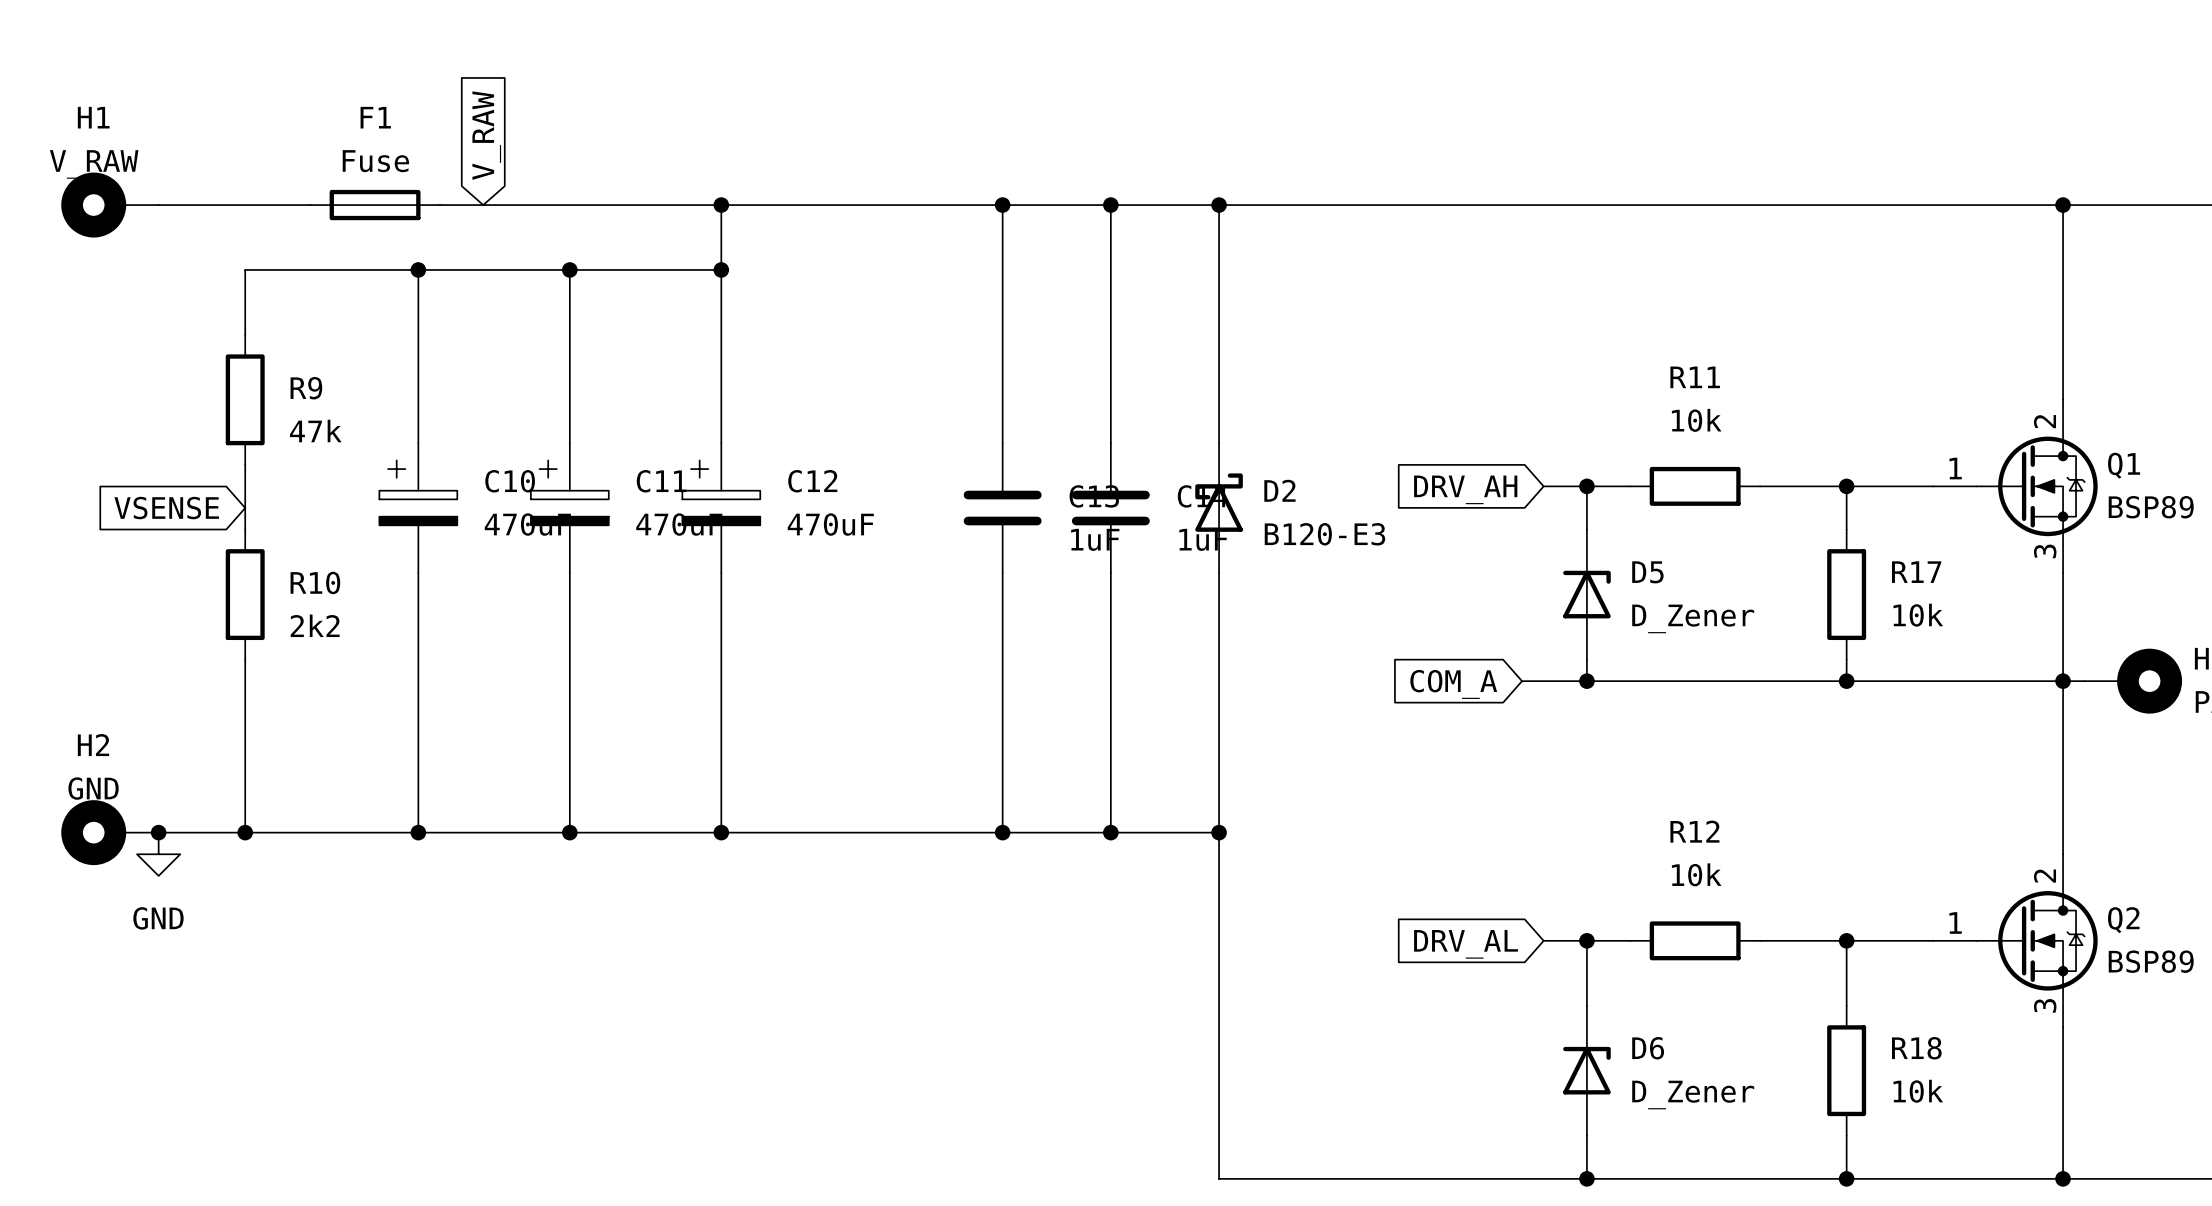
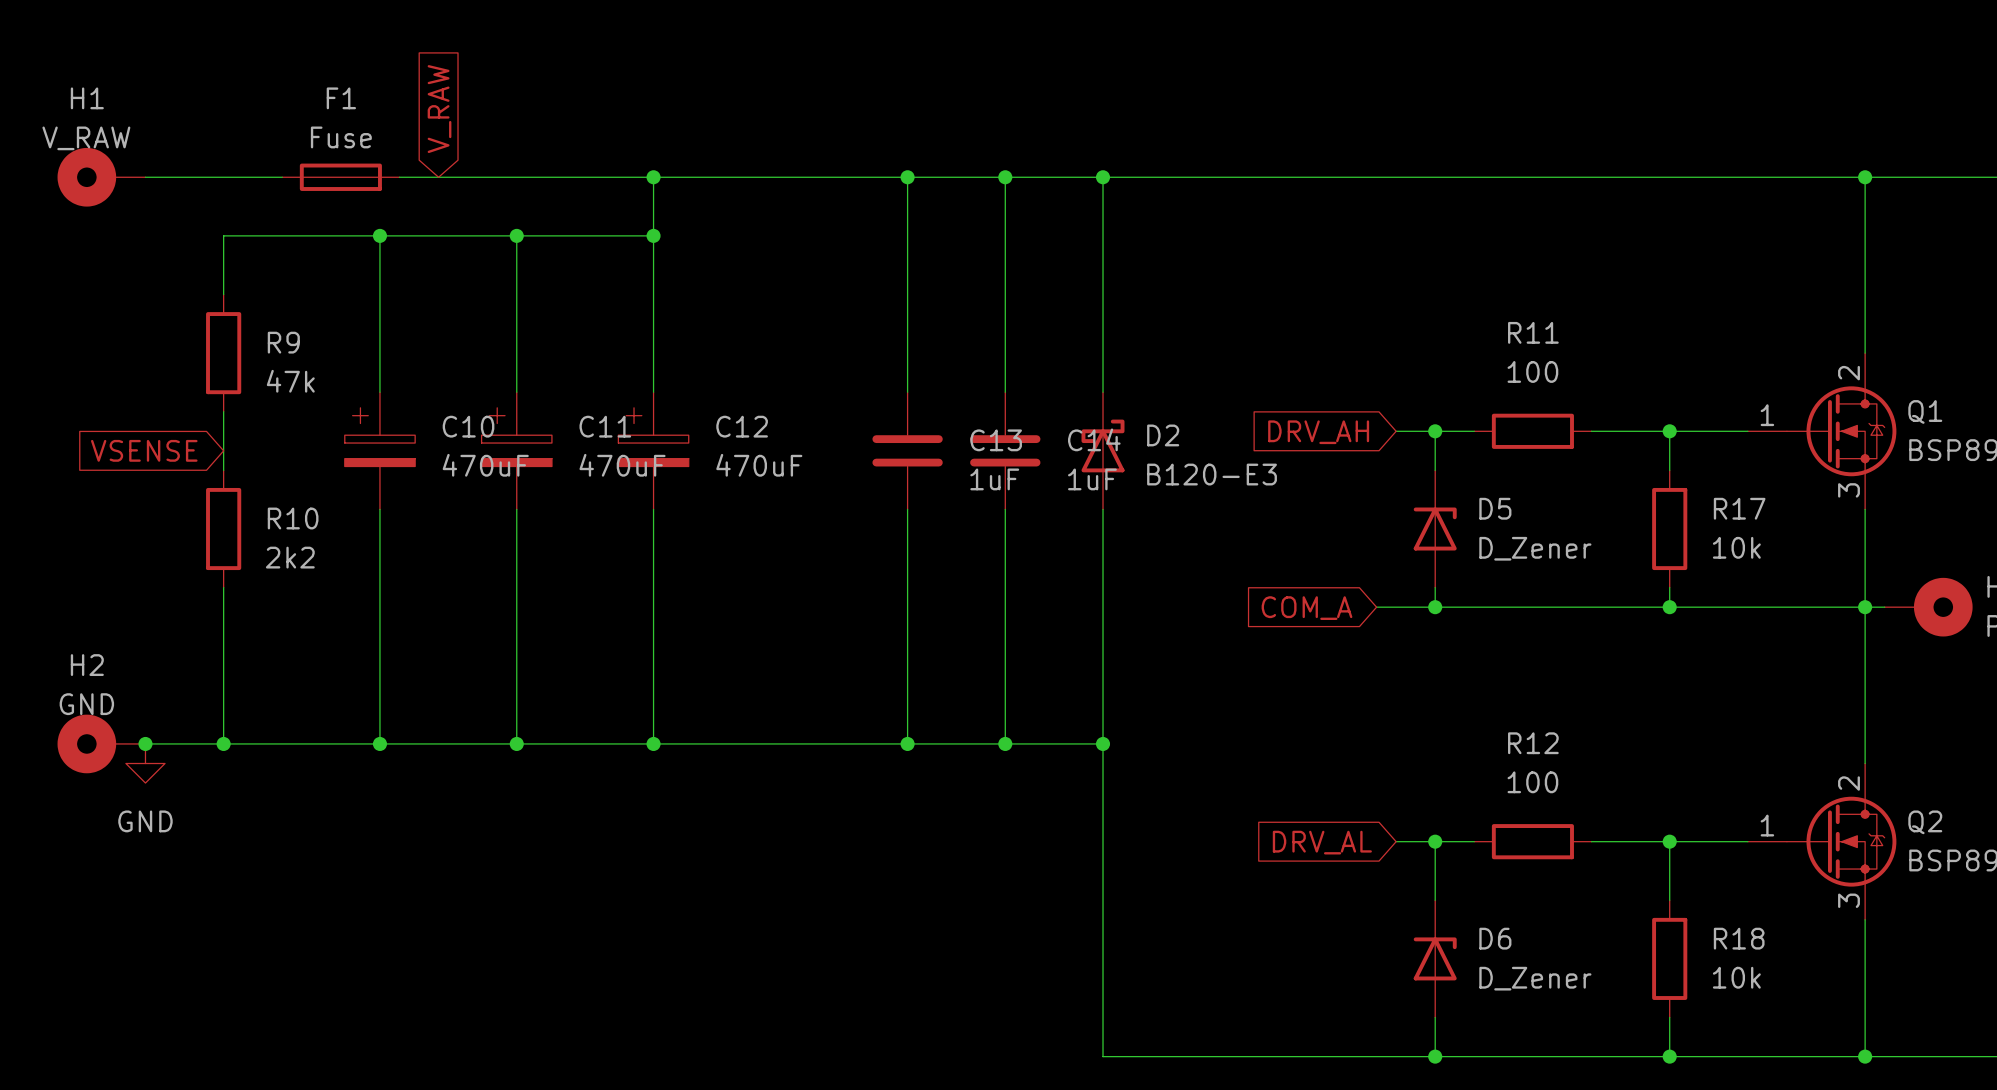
R11 value: 10k (1696, 420) -> 100 (1532, 371)
R12 value: 10k (1696, 874) -> 100 (1532, 782)

